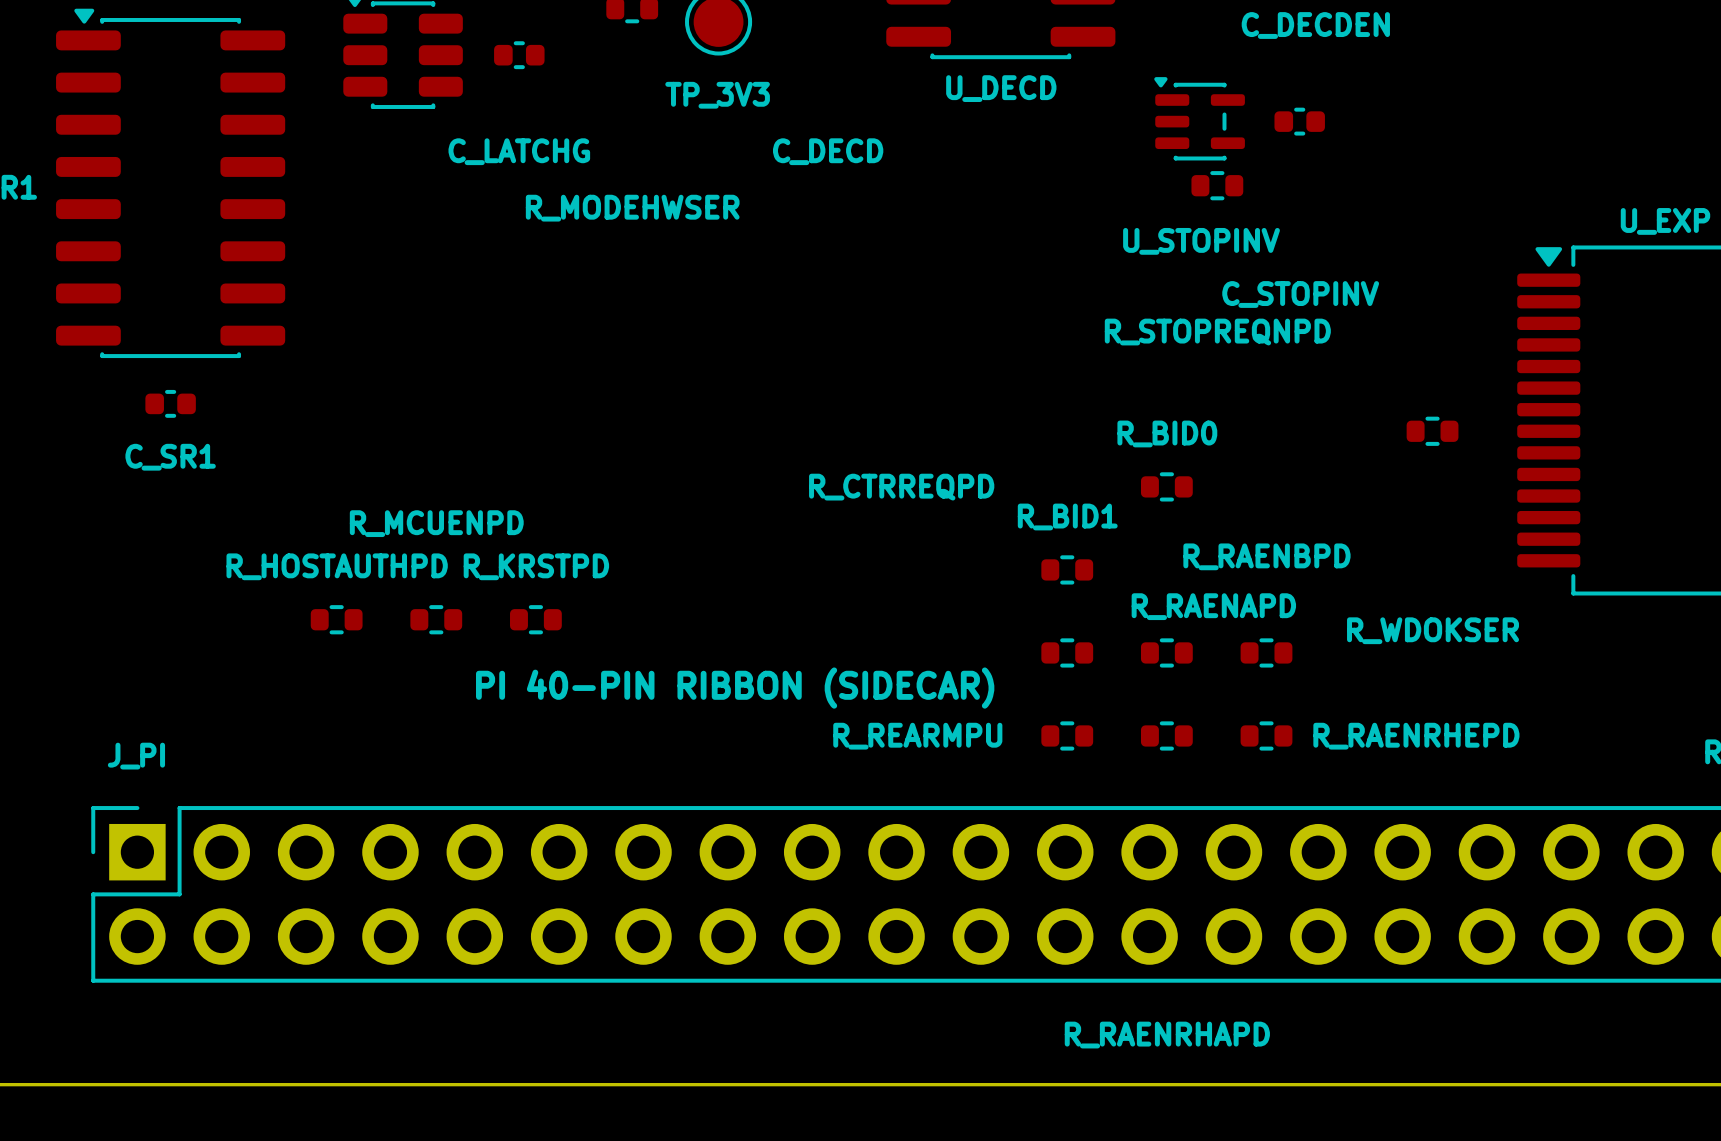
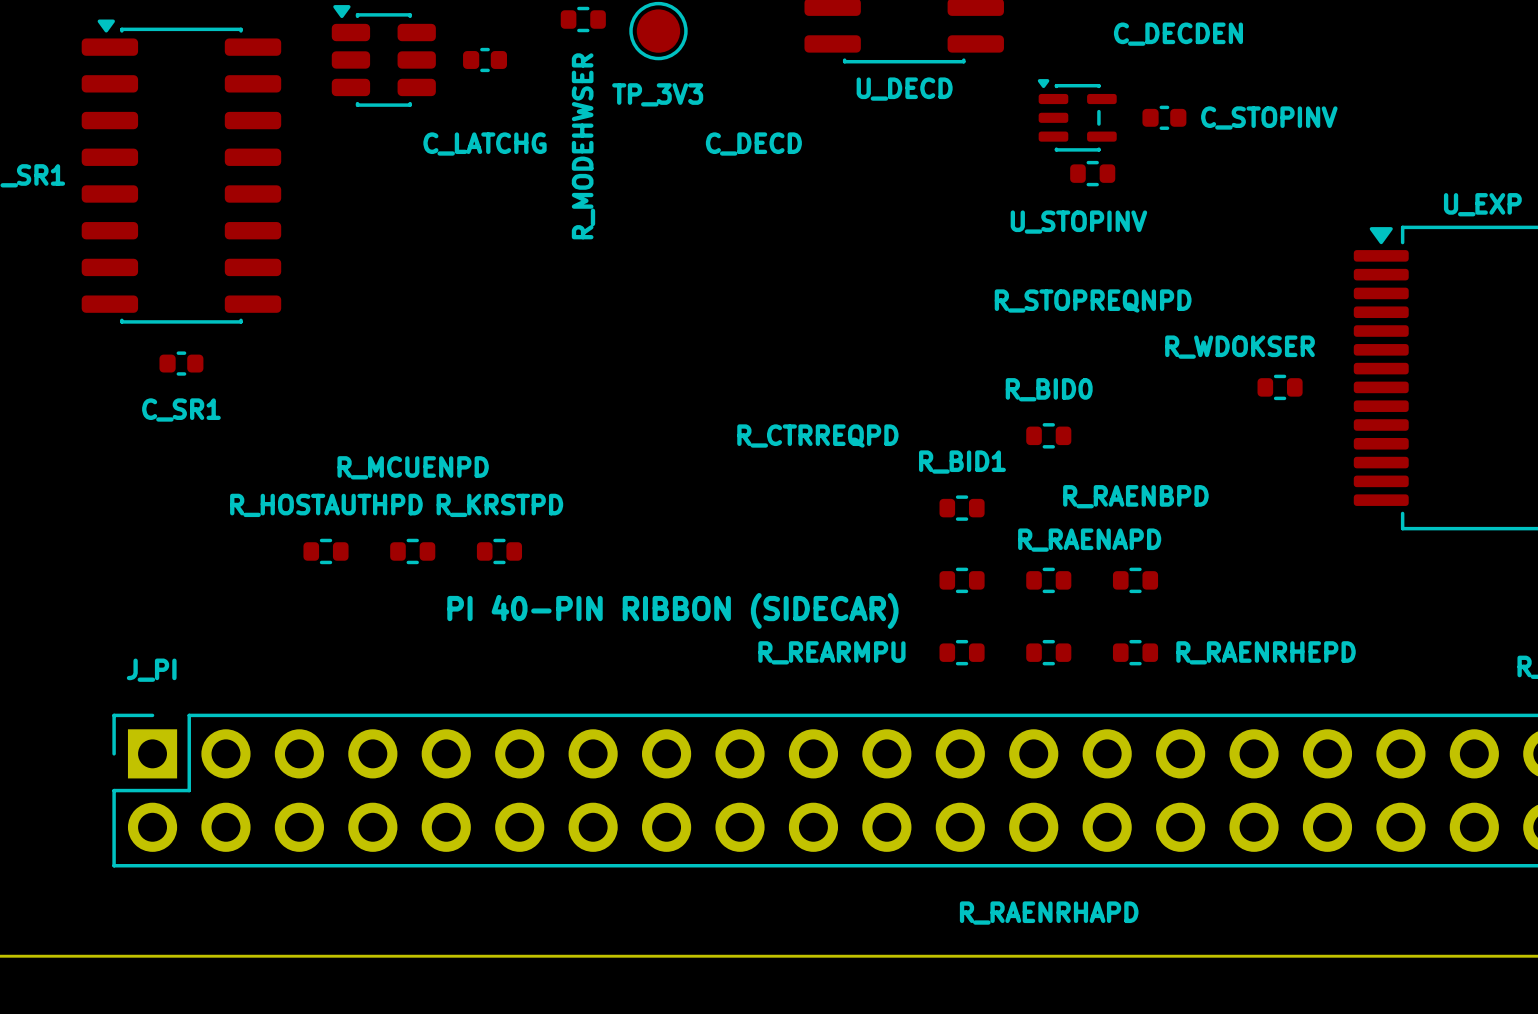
R_MODEHWSER name rotation: 0° (632, 208) -> 90° counterclockwise (583, 146)
C_STOPINV name position: C_STOPINV (1300, 294) -> C_STOPINV (1269, 117)
R_WDOKSER name position: R_WDOKSER (1433, 630) -> R_WDOKSER (1240, 347)

